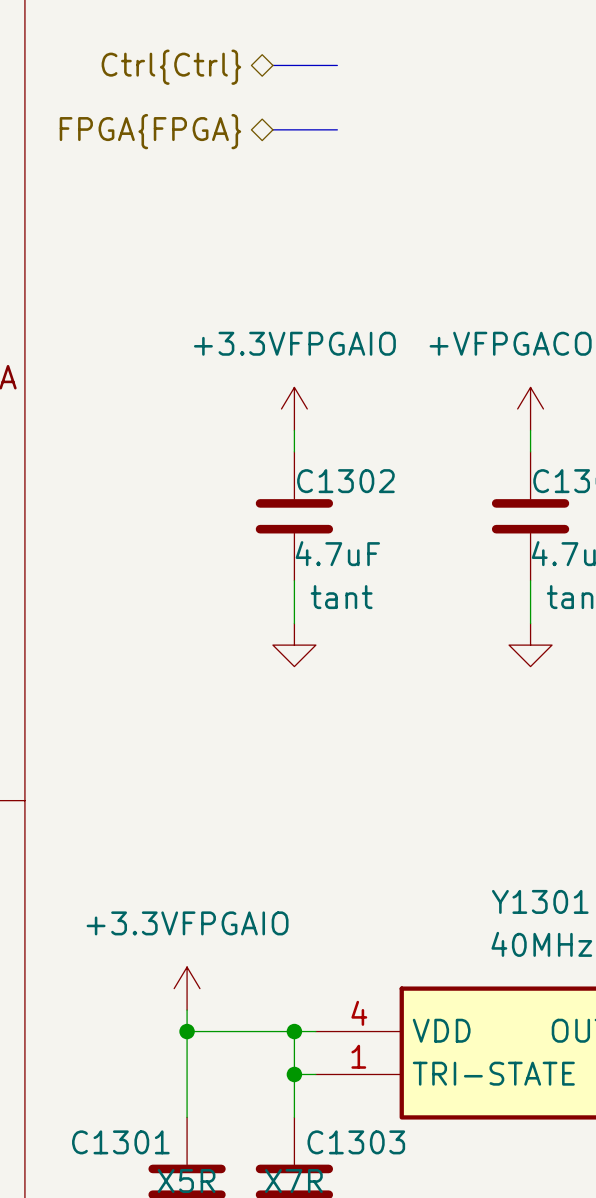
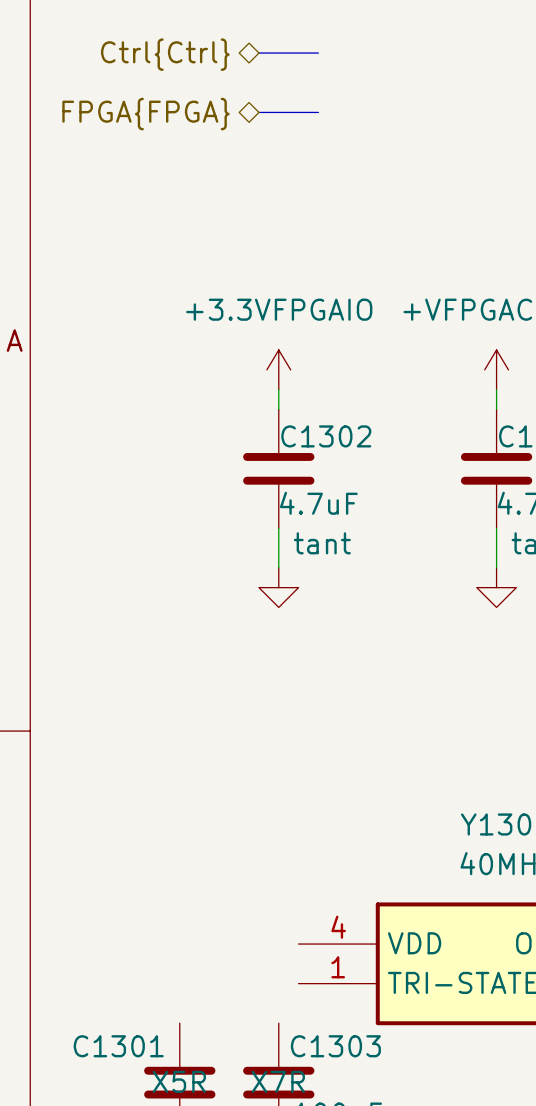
power symbol: +3.3VFPGAIO (187, 988) -> none
wire: (187, 1010) (187, 1117) -> none
wire: (187, 1031) (315, 1031) -> none
junction: (187, 1031) -> none
wire: (294, 1031) (294, 1117) -> none
junction: (294, 1031) -> none
wire: (294, 1074) (315, 1074) -> none
junction: (294, 1074) -> none

